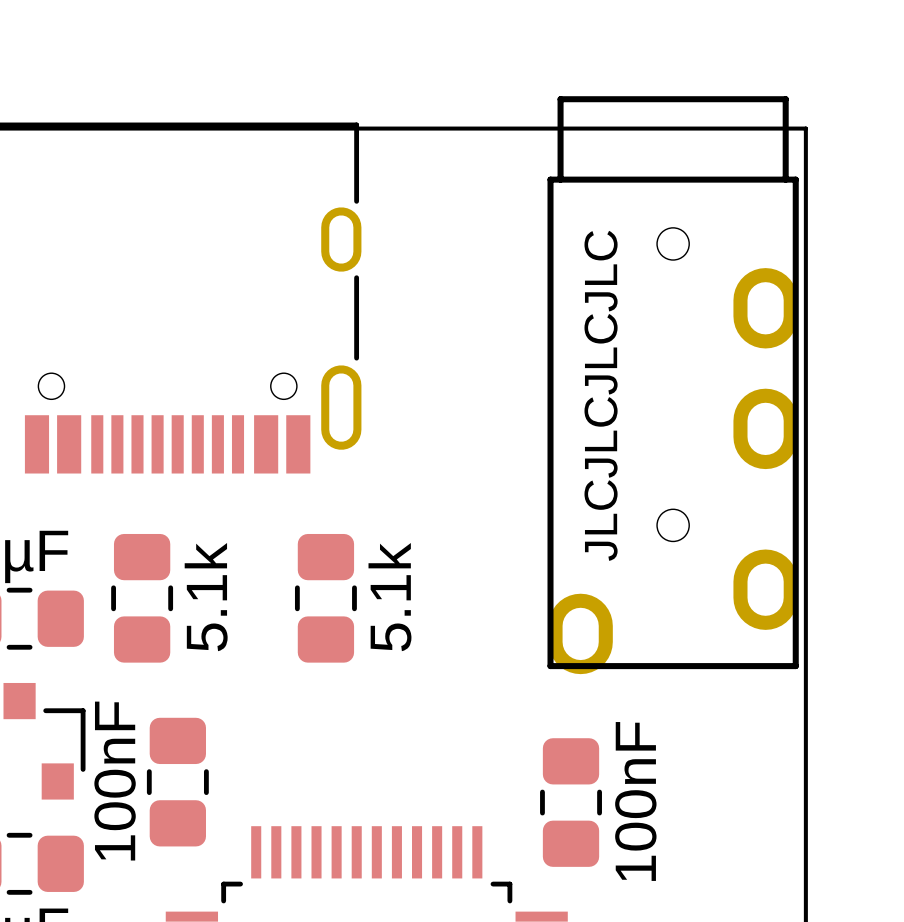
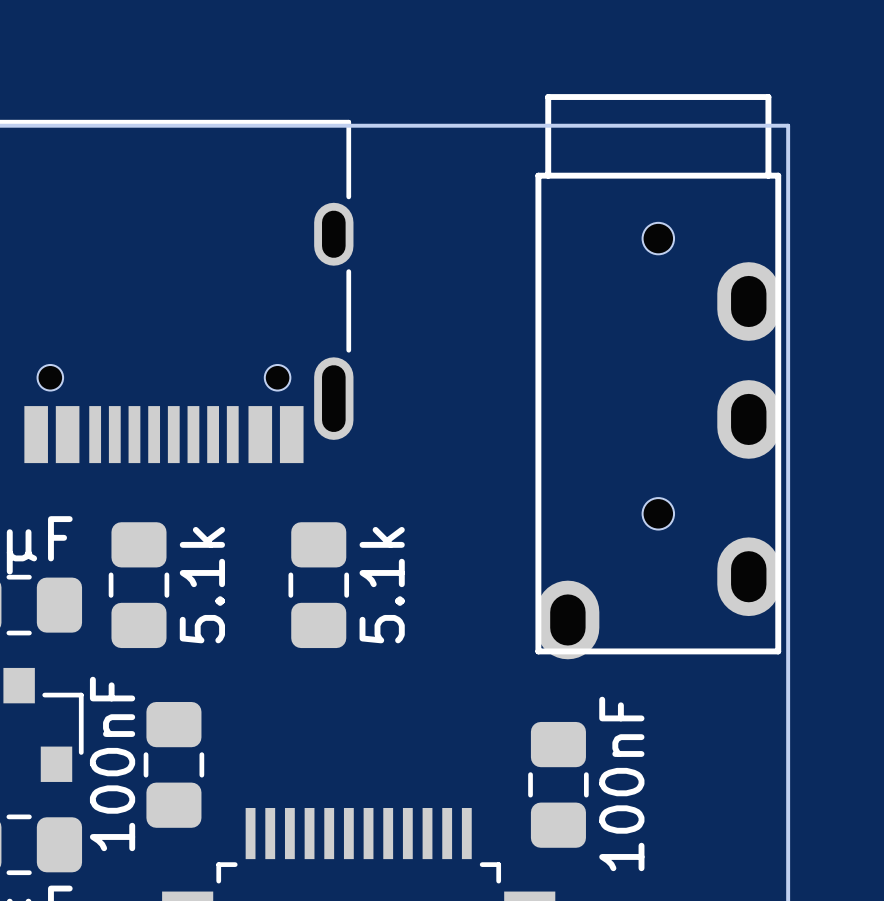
text: JLCJLCJLCJLC (601, 395) -> none

